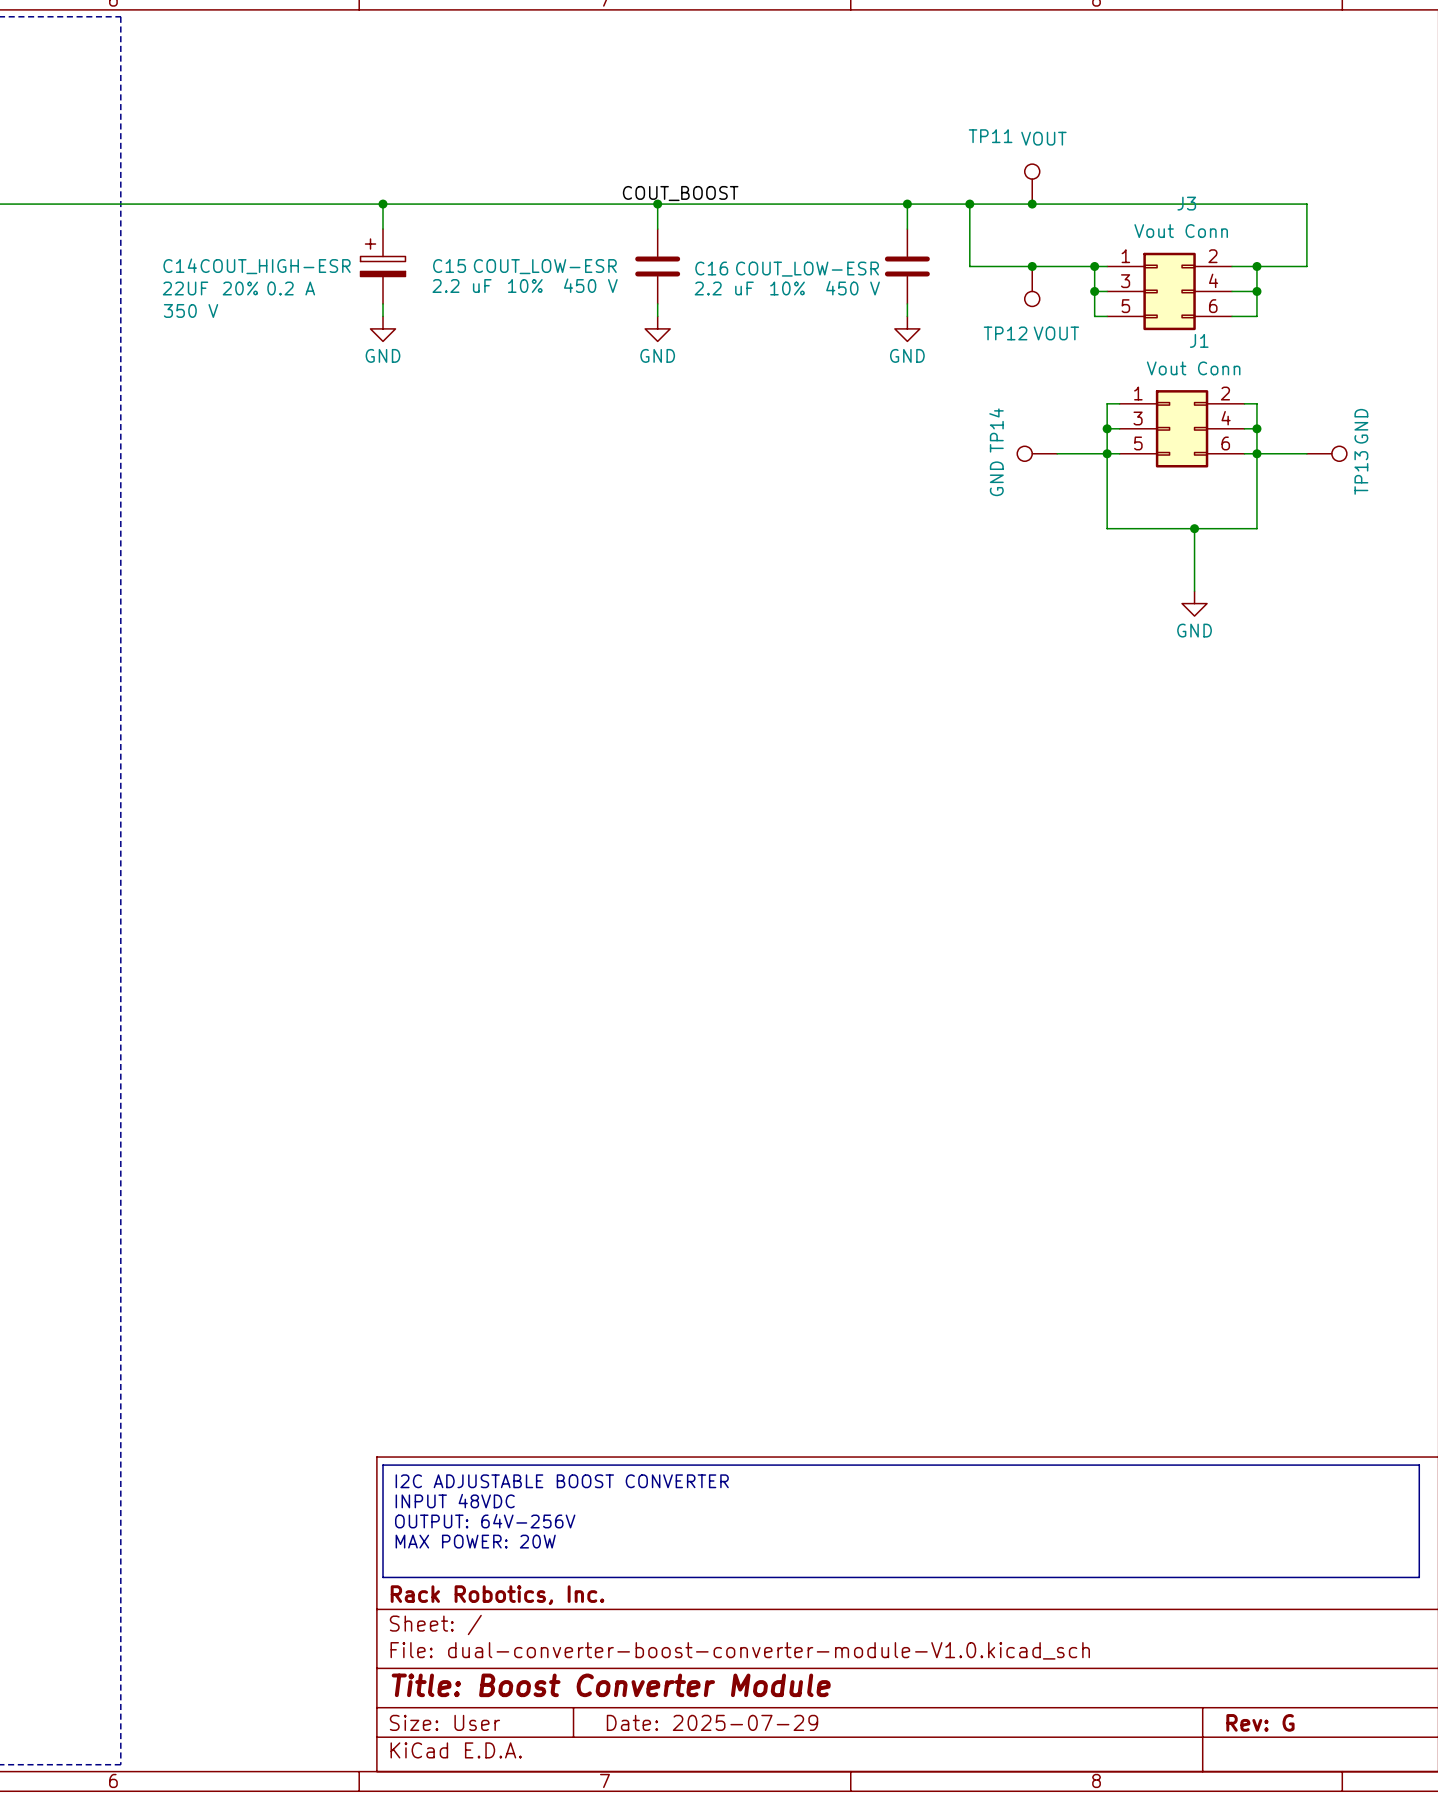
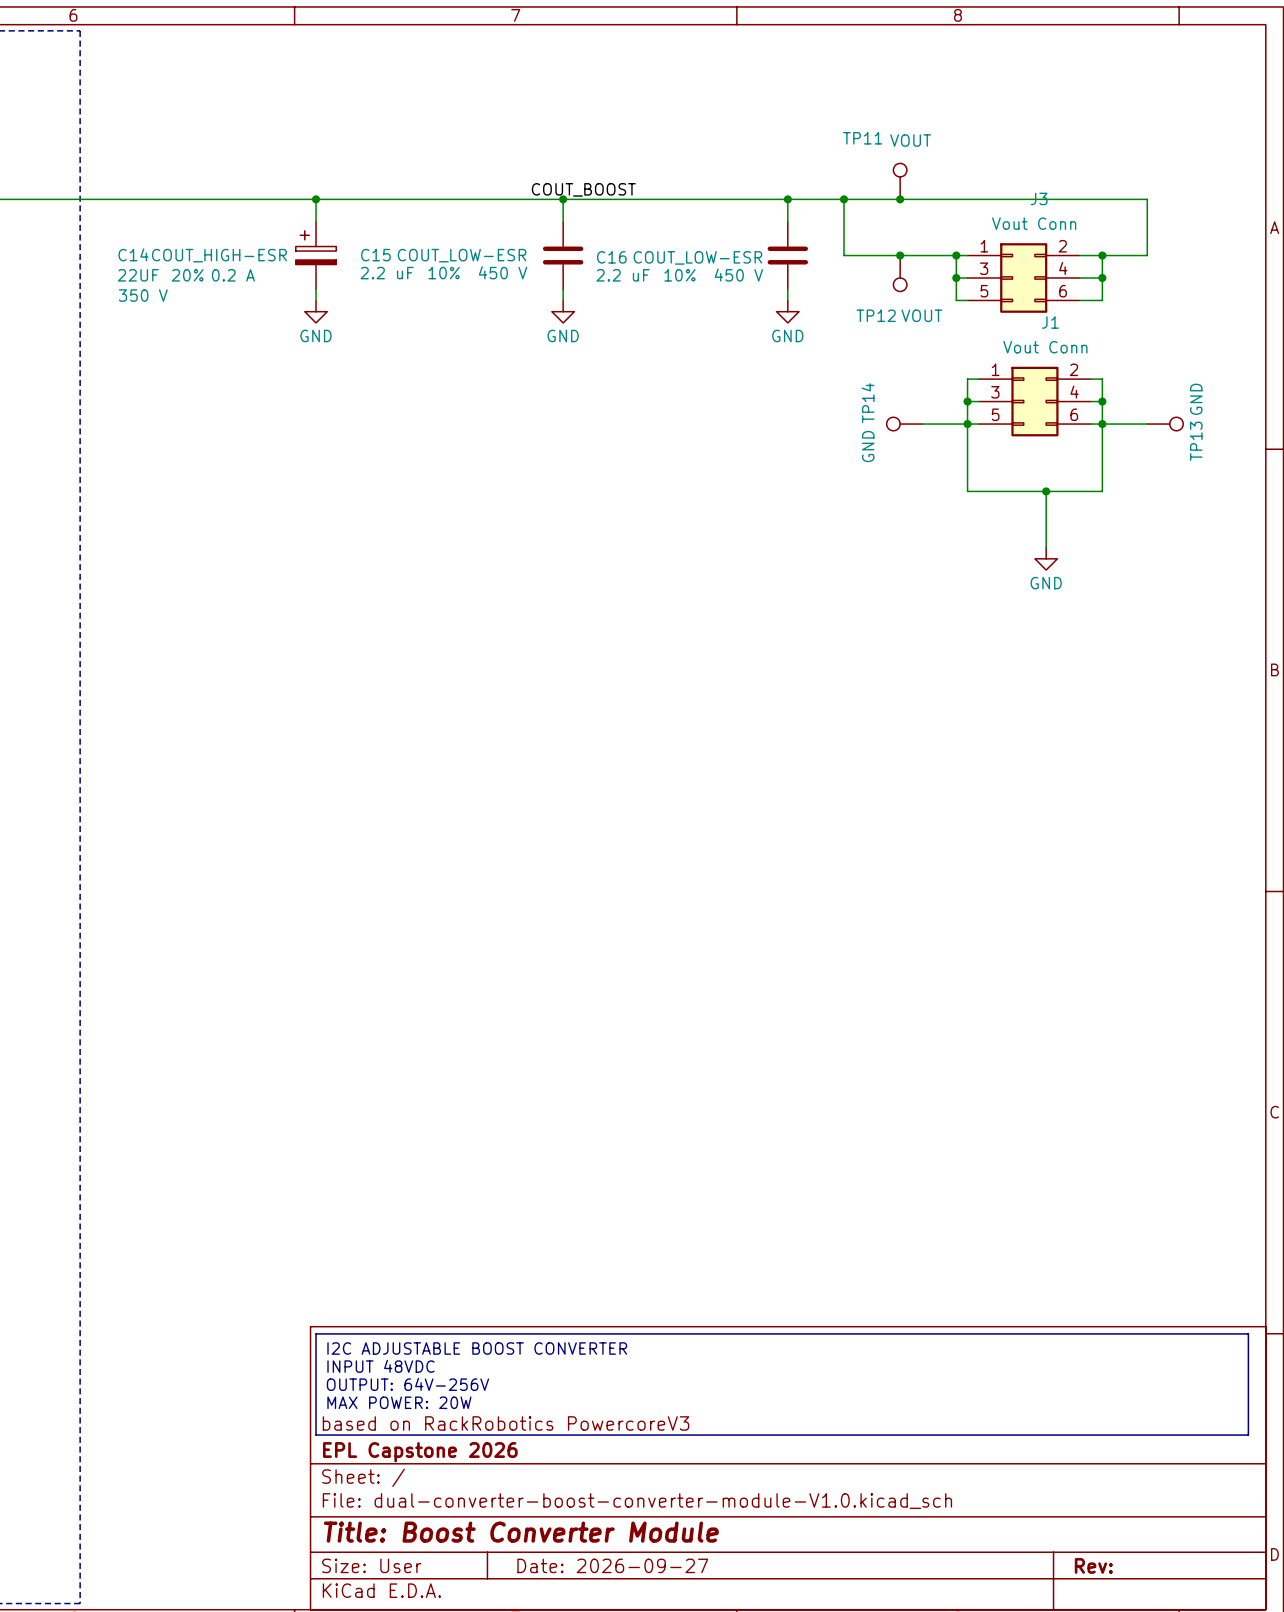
title block: none -> based on RackRobotics PowercoreV3 (506, 1423)
title block: Rack Robotics, Inc. (497, 1595) -> EPL Capstone 2026 (420, 1452)
title block: Date: 2025-07-29 (712, 1722) -> Date: 2026-09-27 (612, 1565)
title block: Rev: G (1260, 1722) -> Rev: (1093, 1565)

